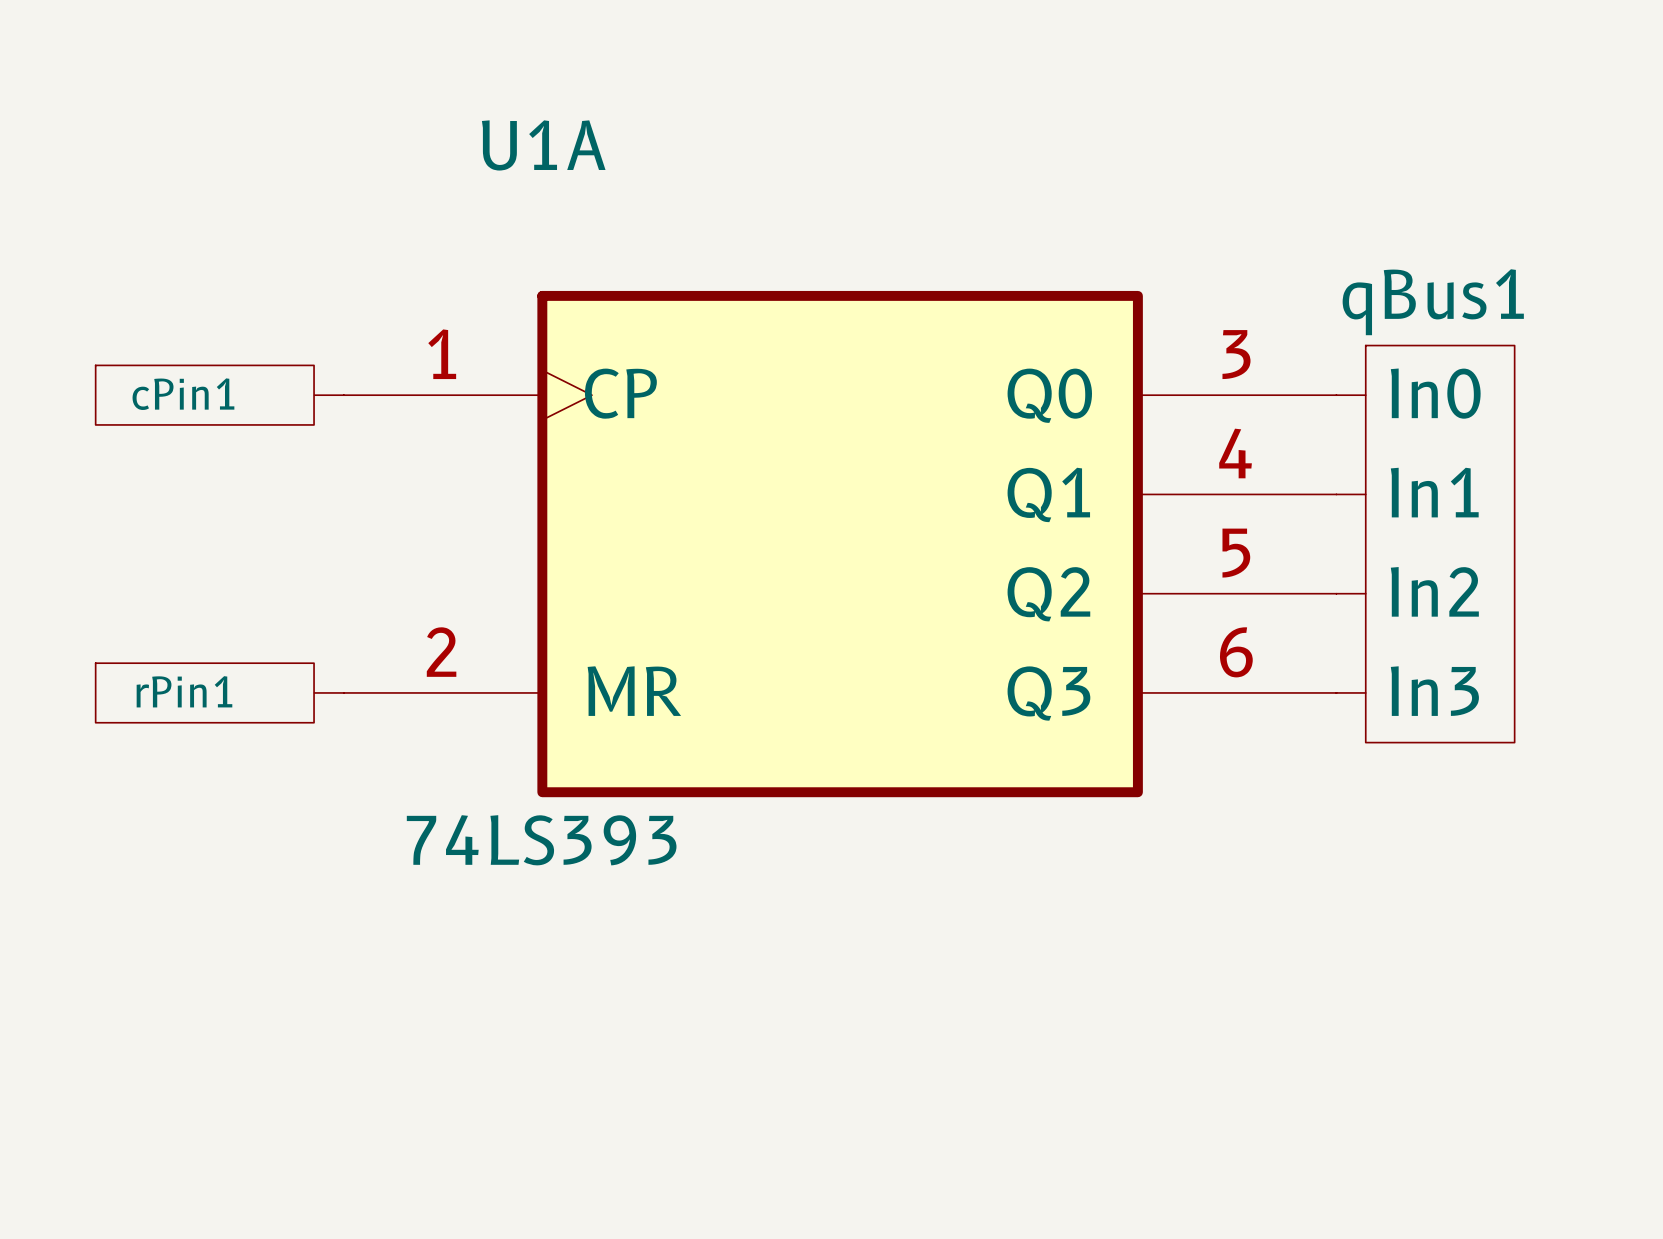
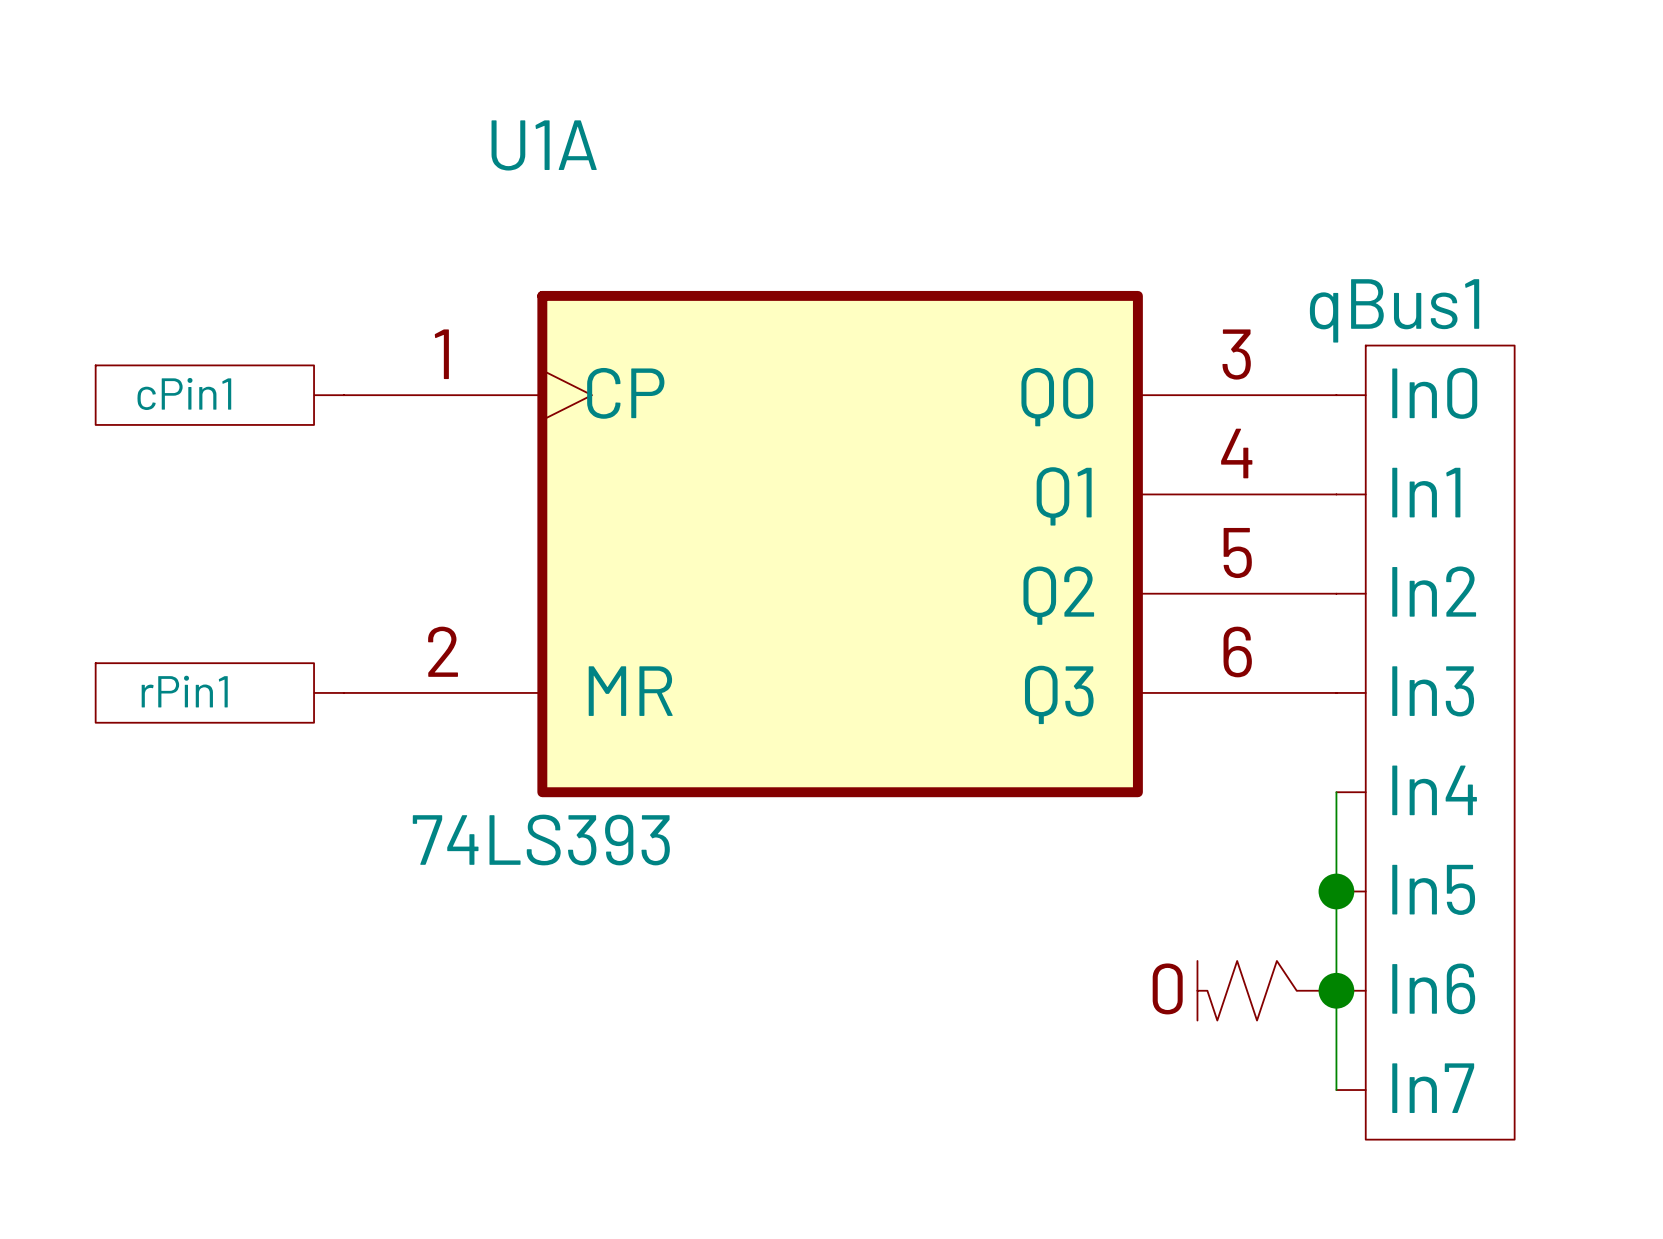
qBus1 name position: qBus1 (1433, 302) -> qBus1 (1394, 310)
qBus1 symbol: [1336, 345, 1515, 743] -> [1336, 345, 1515, 1140]
wire: none -> (1336, 792) (1336, 1090)
junction: none -> (1336, 891)
part: none -> (1266, 990)
junction: none -> (1336, 990)

